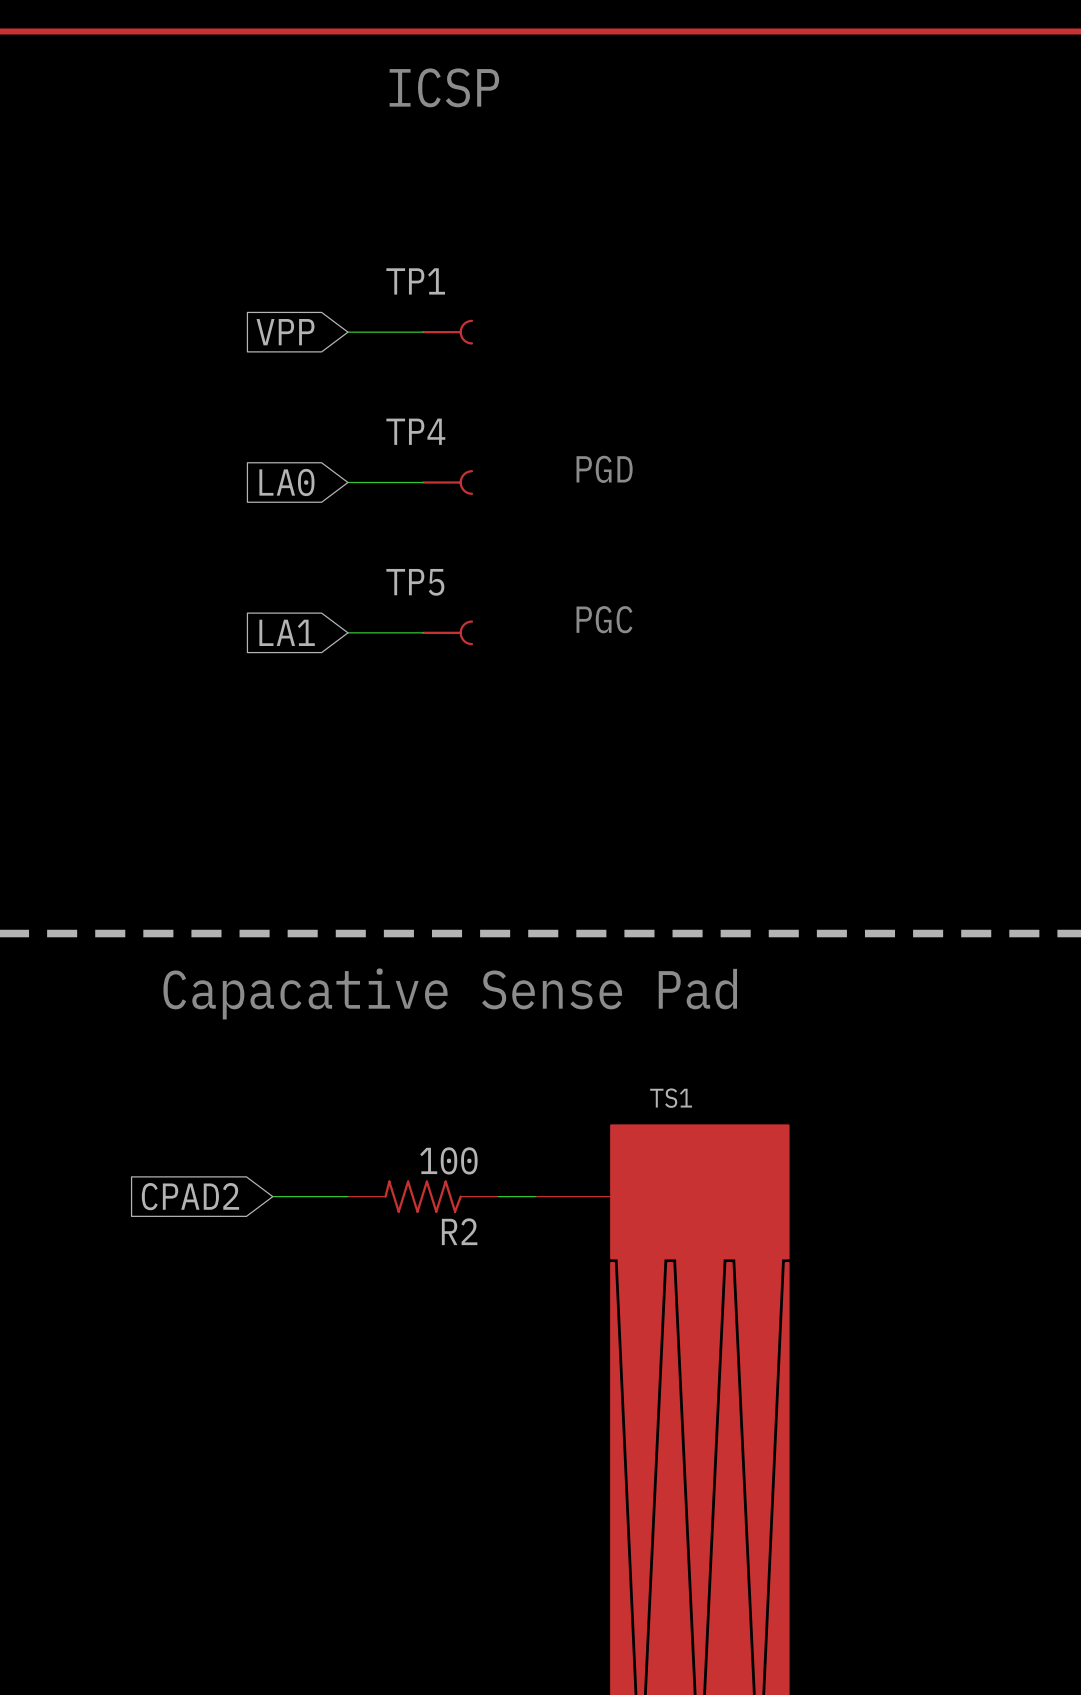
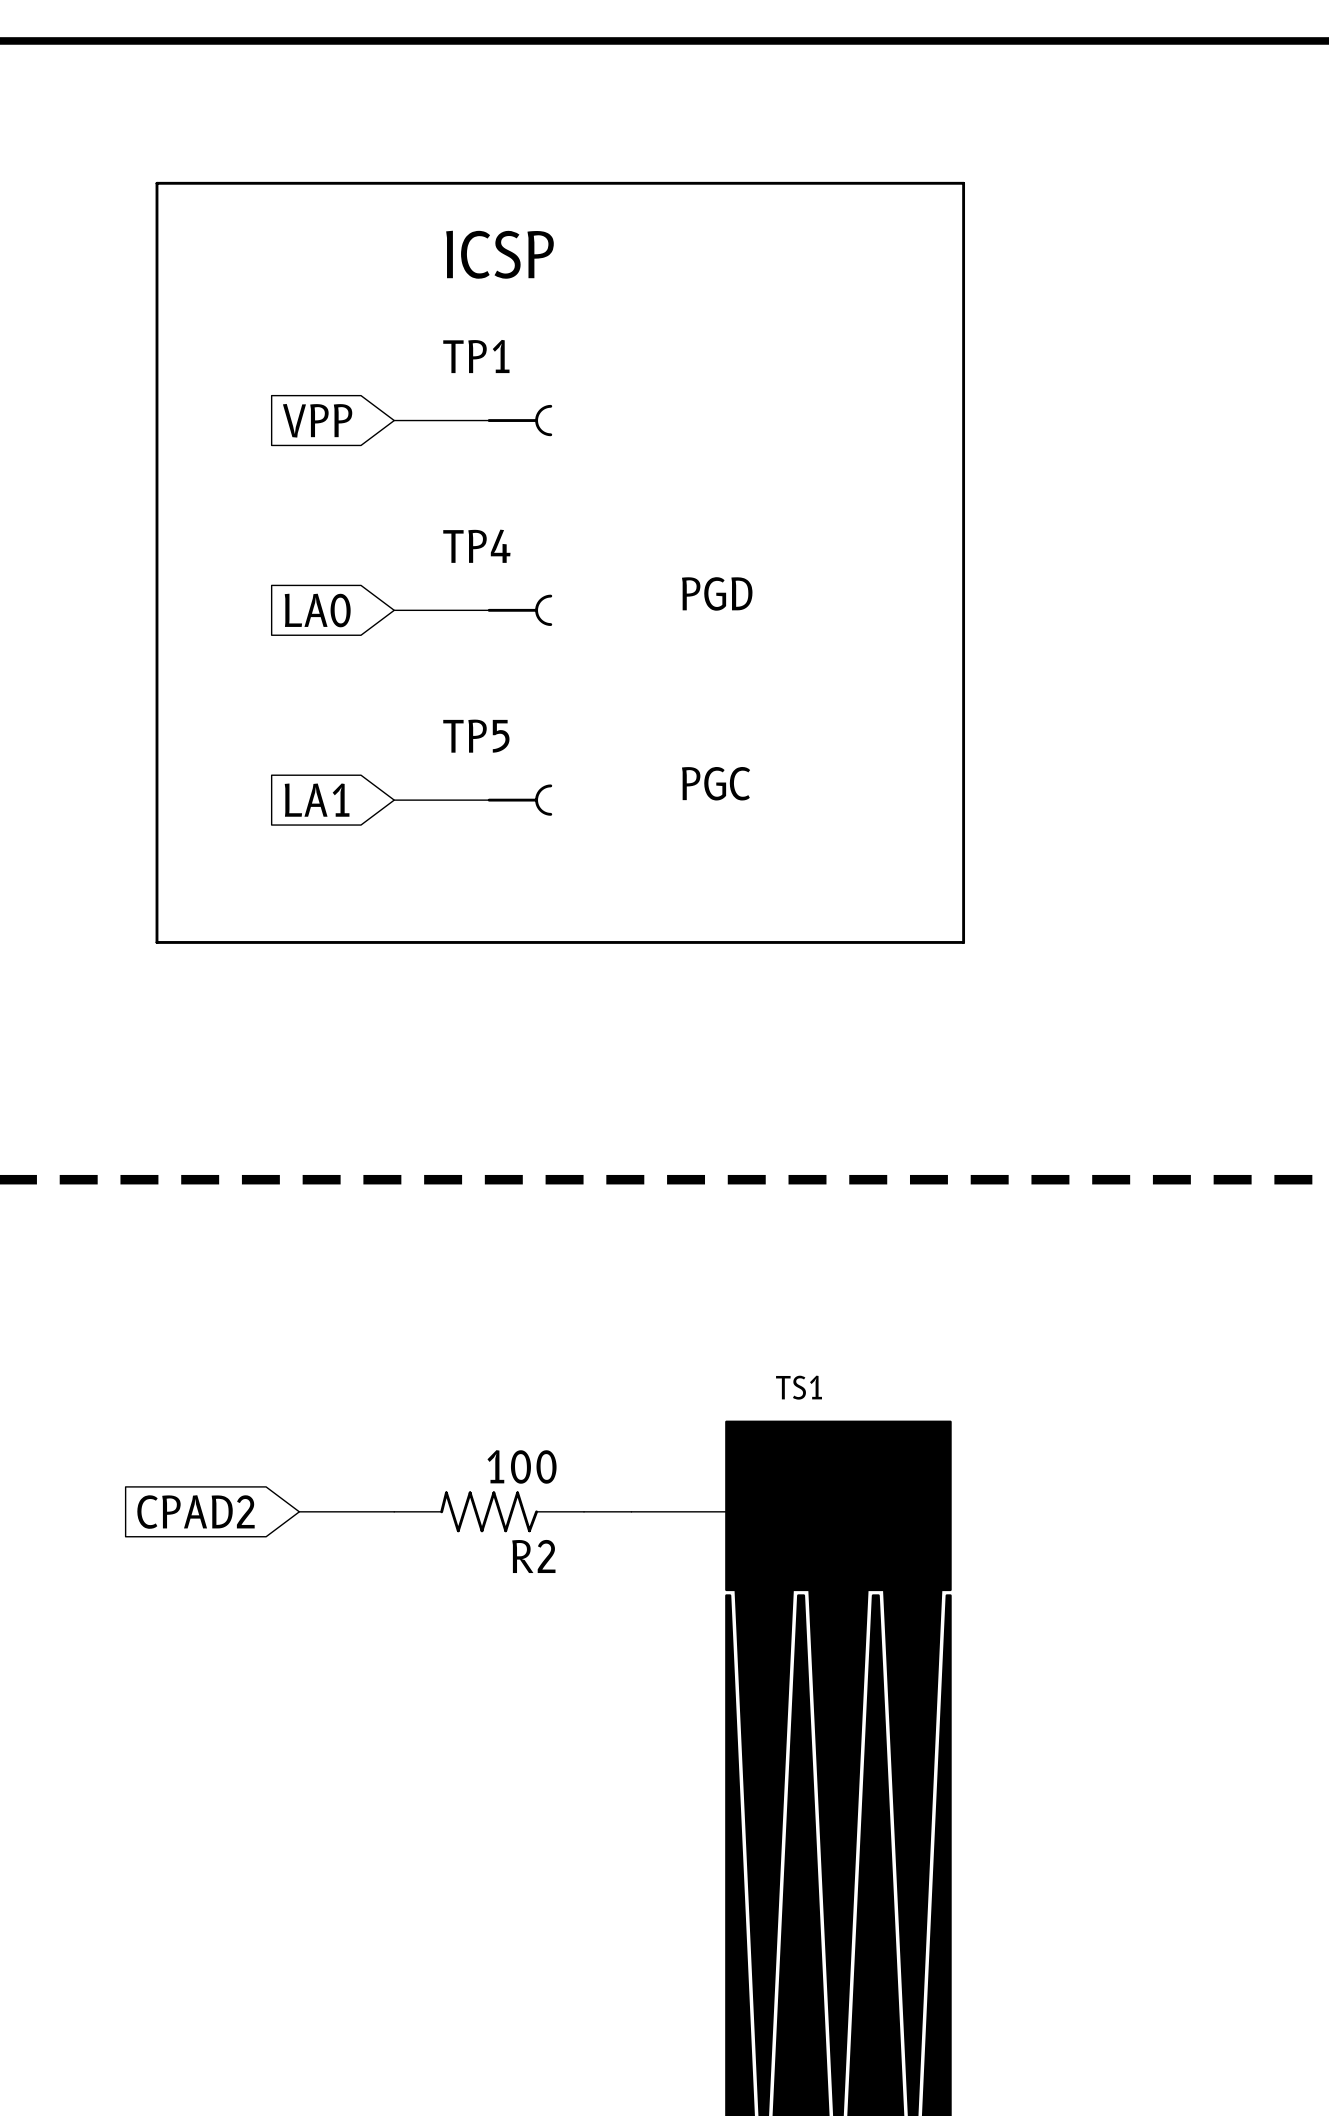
text position: ICSP (444, 87) -> ICSP (499, 254)
line: none -> (156, 183) (963, 183) (963, 942) (156, 942) (156, 183)
text: Capacative Sense Pad (450, 993) -> none

